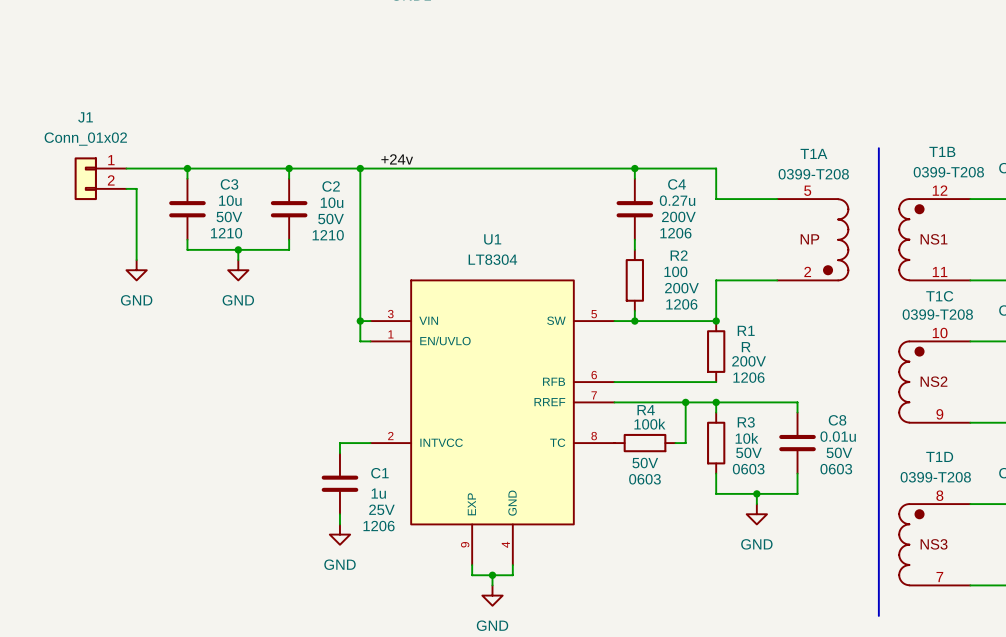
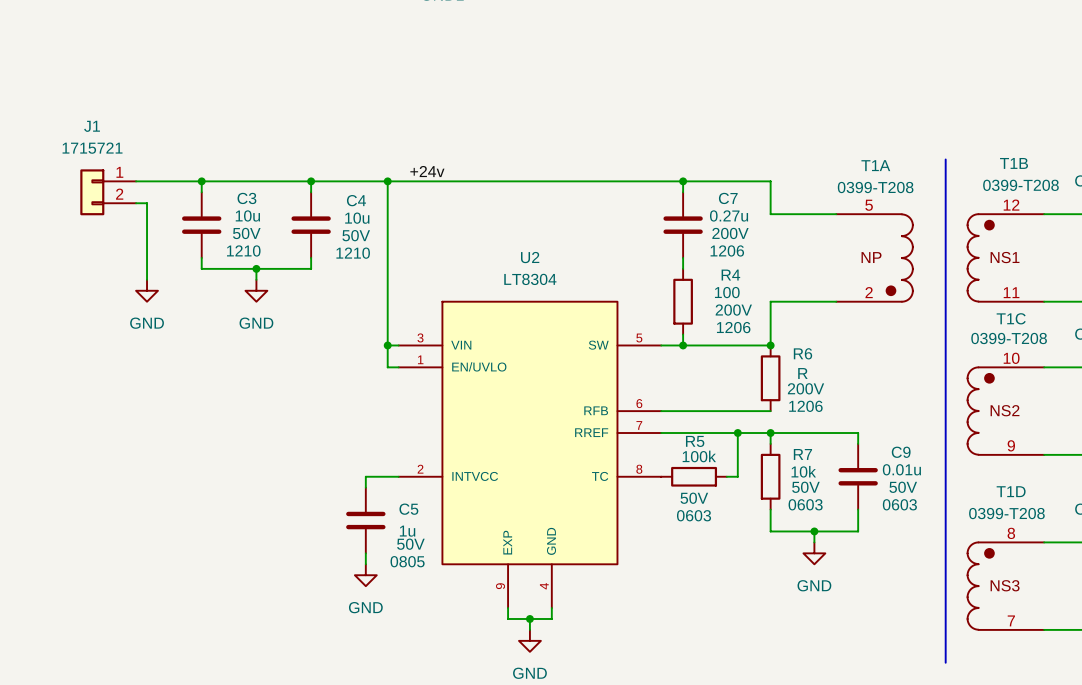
J1 value: Conn_01x02 (85, 139) -> 1715721 (92, 148)
C4 name: C4 (676, 184) -> C7 (728, 198)
C2 name: C2 (331, 186) -> C4 (356, 200)
U1 name: U1 (492, 239) -> U2 (530, 257)
R2 name: R2 (679, 255) -> R4 (730, 275)
R1 name: R1 (746, 330) -> R6 (802, 353)
R4 name: R4 (646, 410) -> R5 (695, 441)
C8 name: C8 (837, 420) -> C9 (901, 452)
R3 name: R3 (746, 422) -> R7 (802, 454)
C1 name: C1 (379, 473) -> C5 (408, 509)
C1 text: 25V (381, 509) -> 50V (410, 544)
C1 text: 1206 (379, 526) -> 0805 (407, 561)

